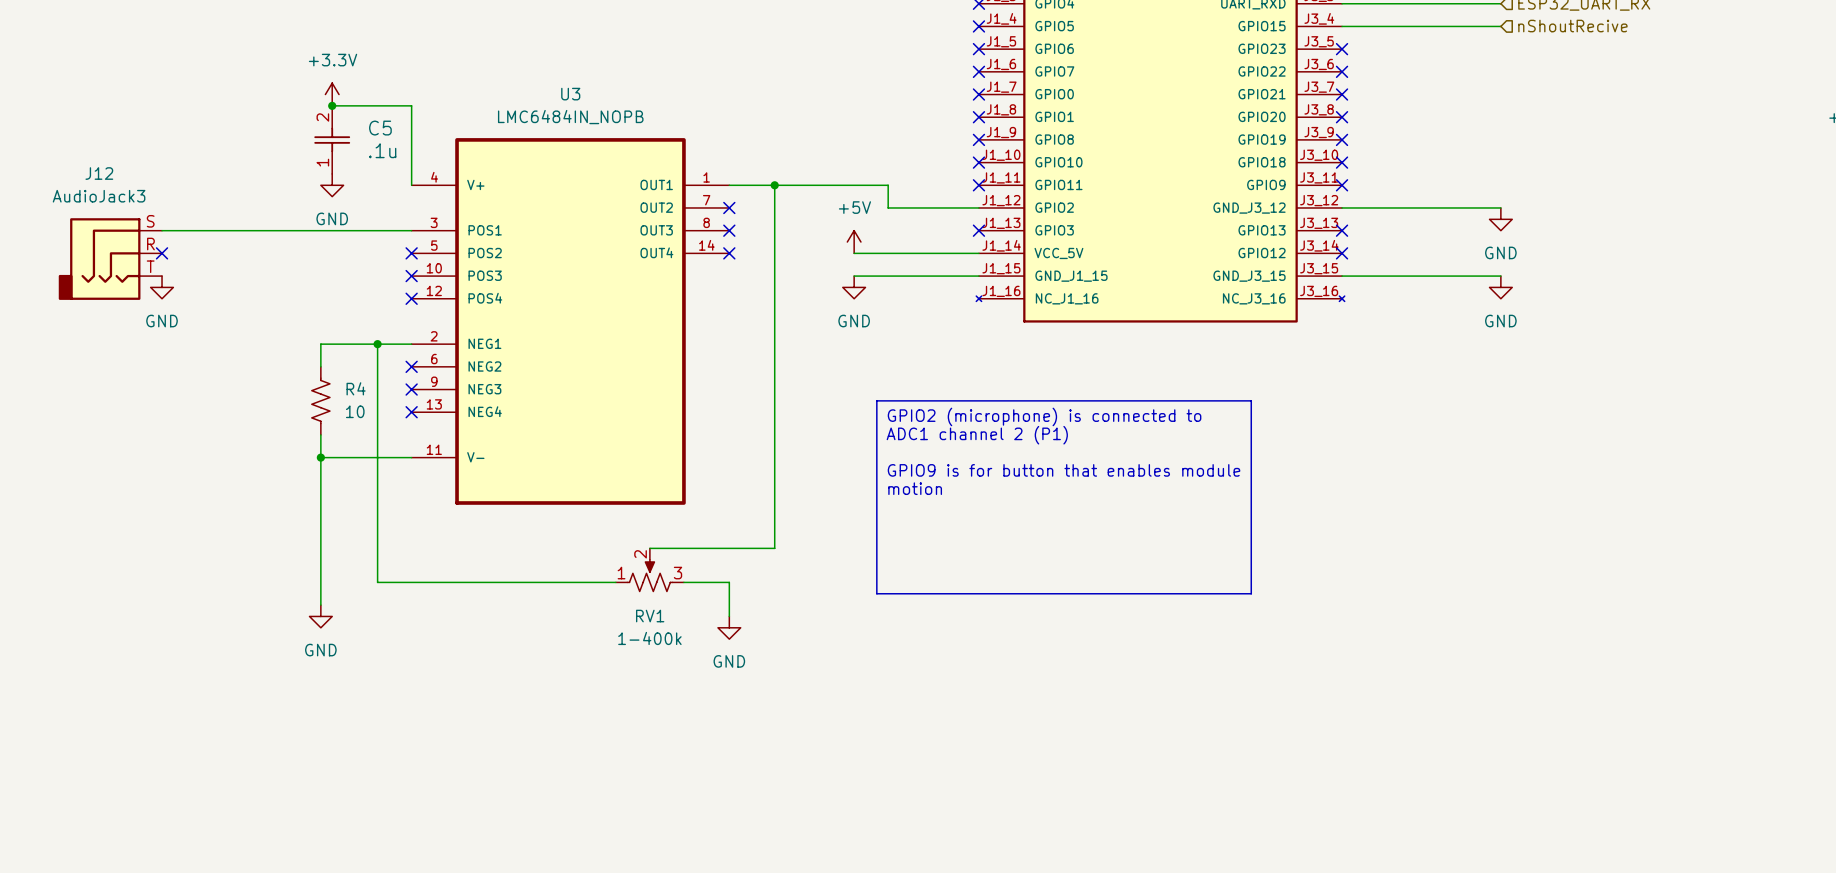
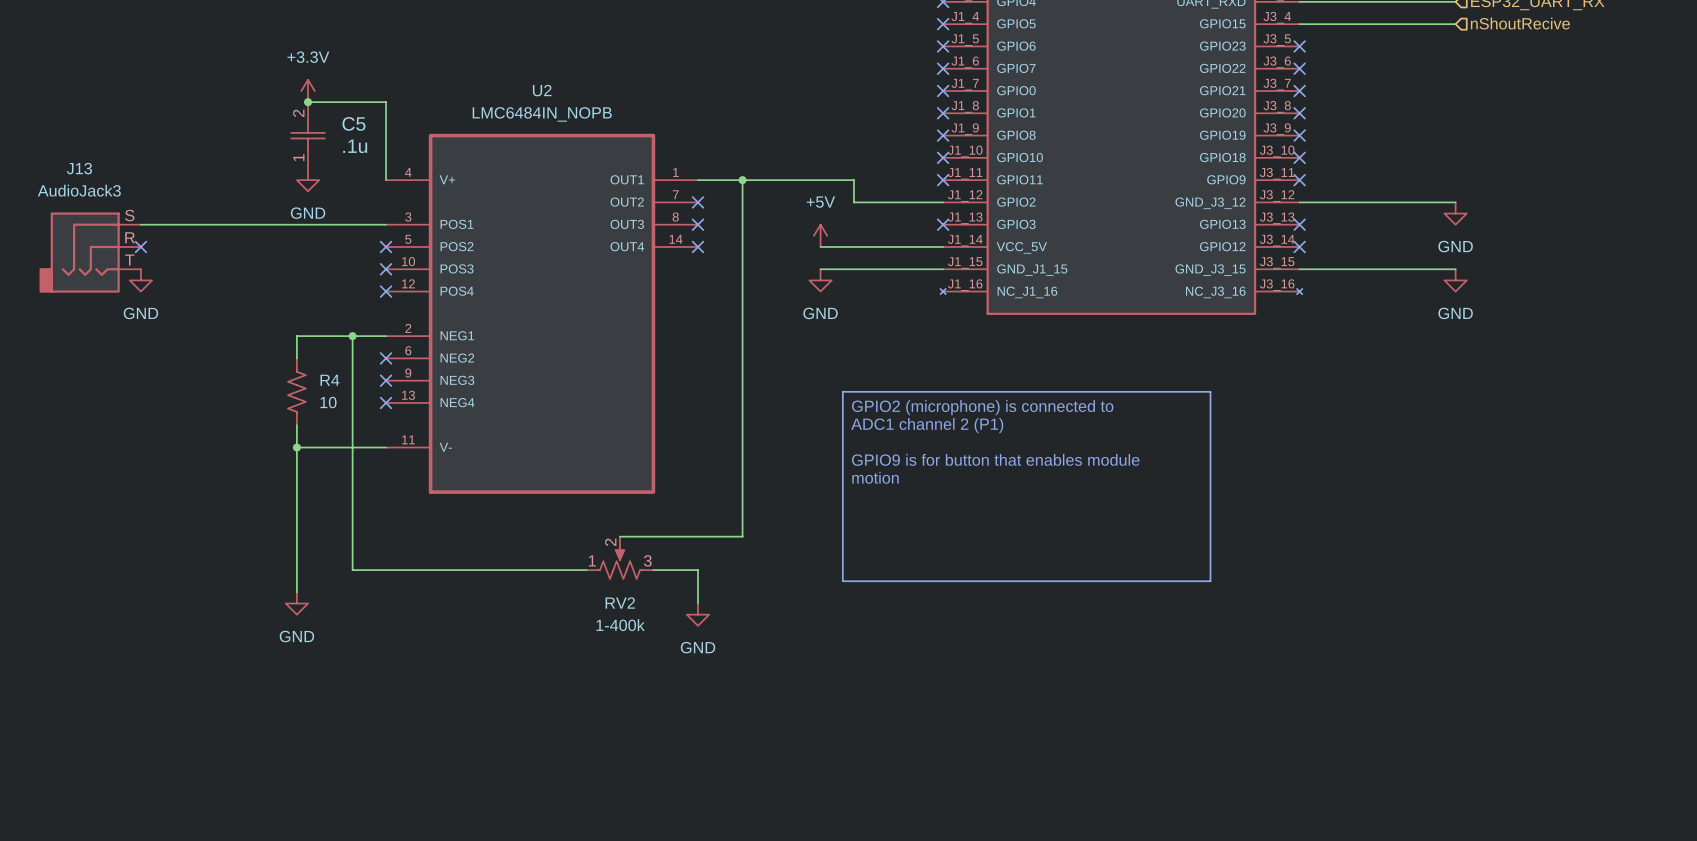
U3 name: U3 (570, 94) -> U2 (542, 90)
J12 name: J12 (99, 173) -> J13 (79, 168)
RV1 name: RV1 (650, 616) -> RV2 (620, 603)

